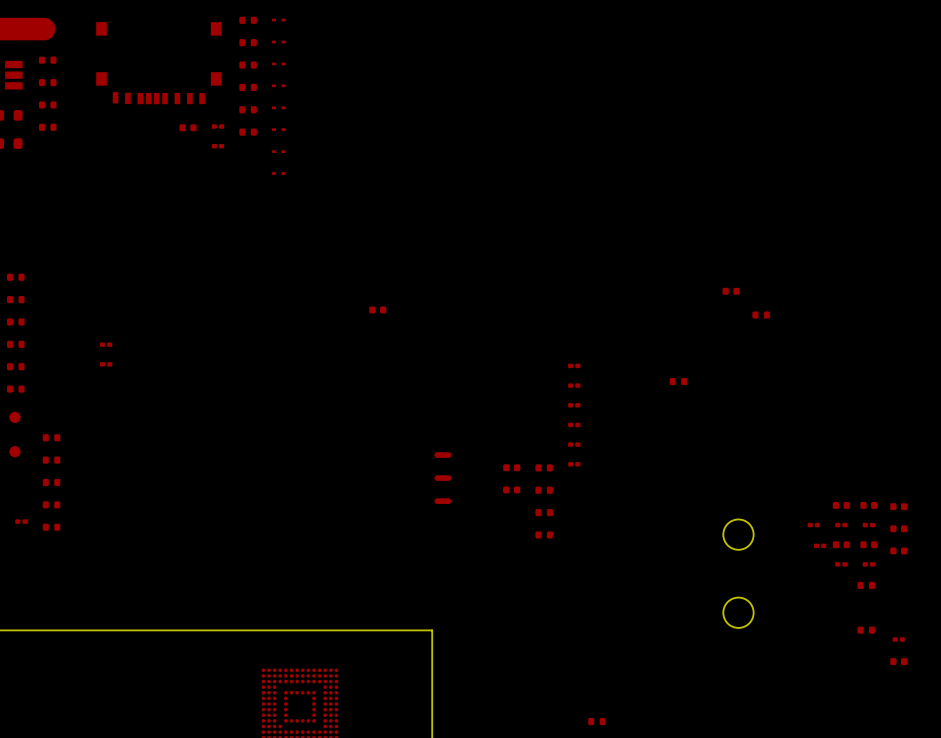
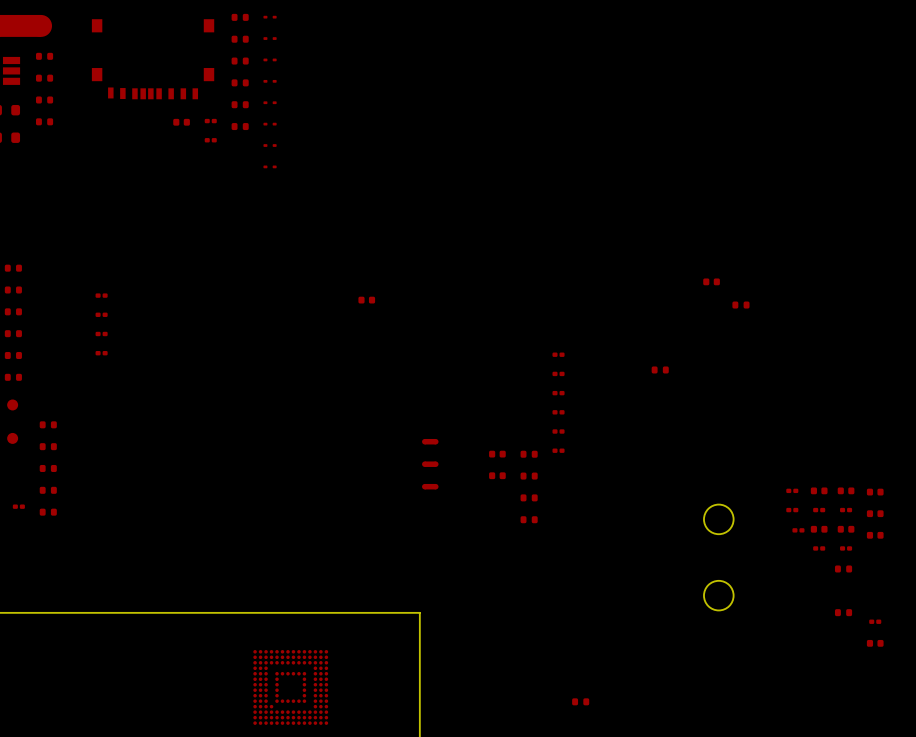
part: none -> (101, 295)
part: none -> (101, 314)
part: none -> (792, 490)

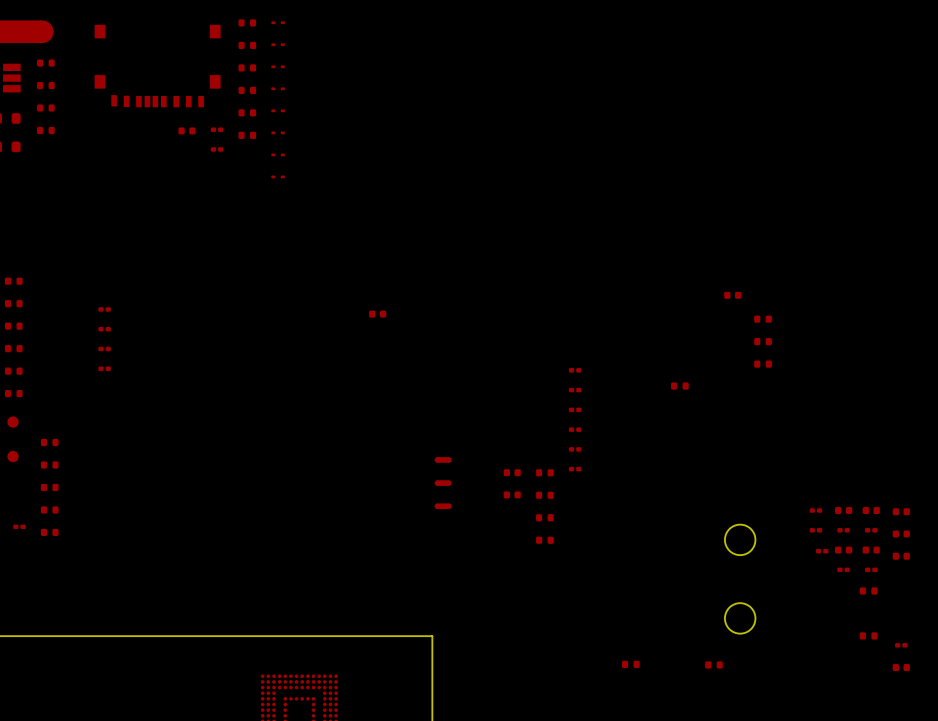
part: none -> (763, 341)
part: none -> (763, 364)
part: none -> (630, 664)
part: none -> (713, 664)

